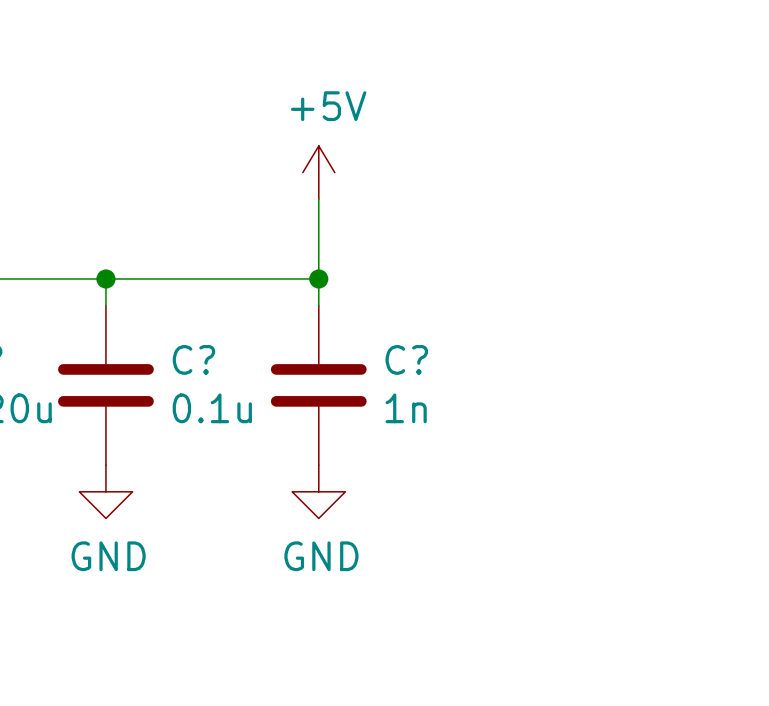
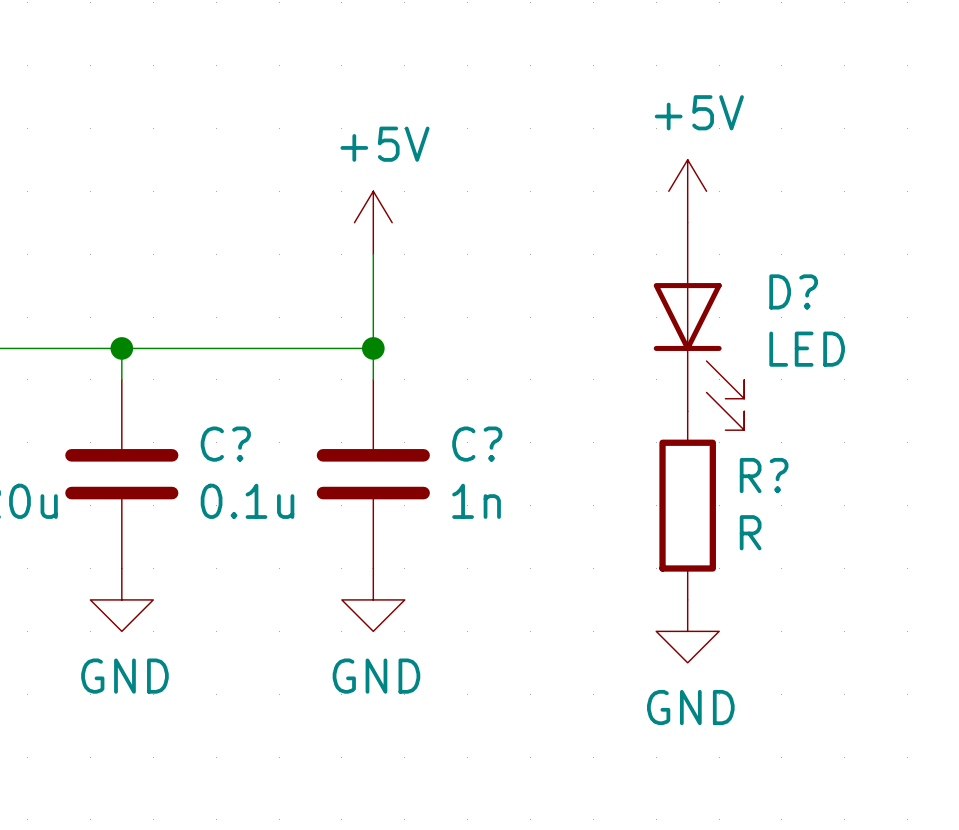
power symbol: none -> +5V (687, 191)
D?: none -> LED (699, 326)
R?: none -> R (687, 505)
power symbol: none -> GND (687, 631)

